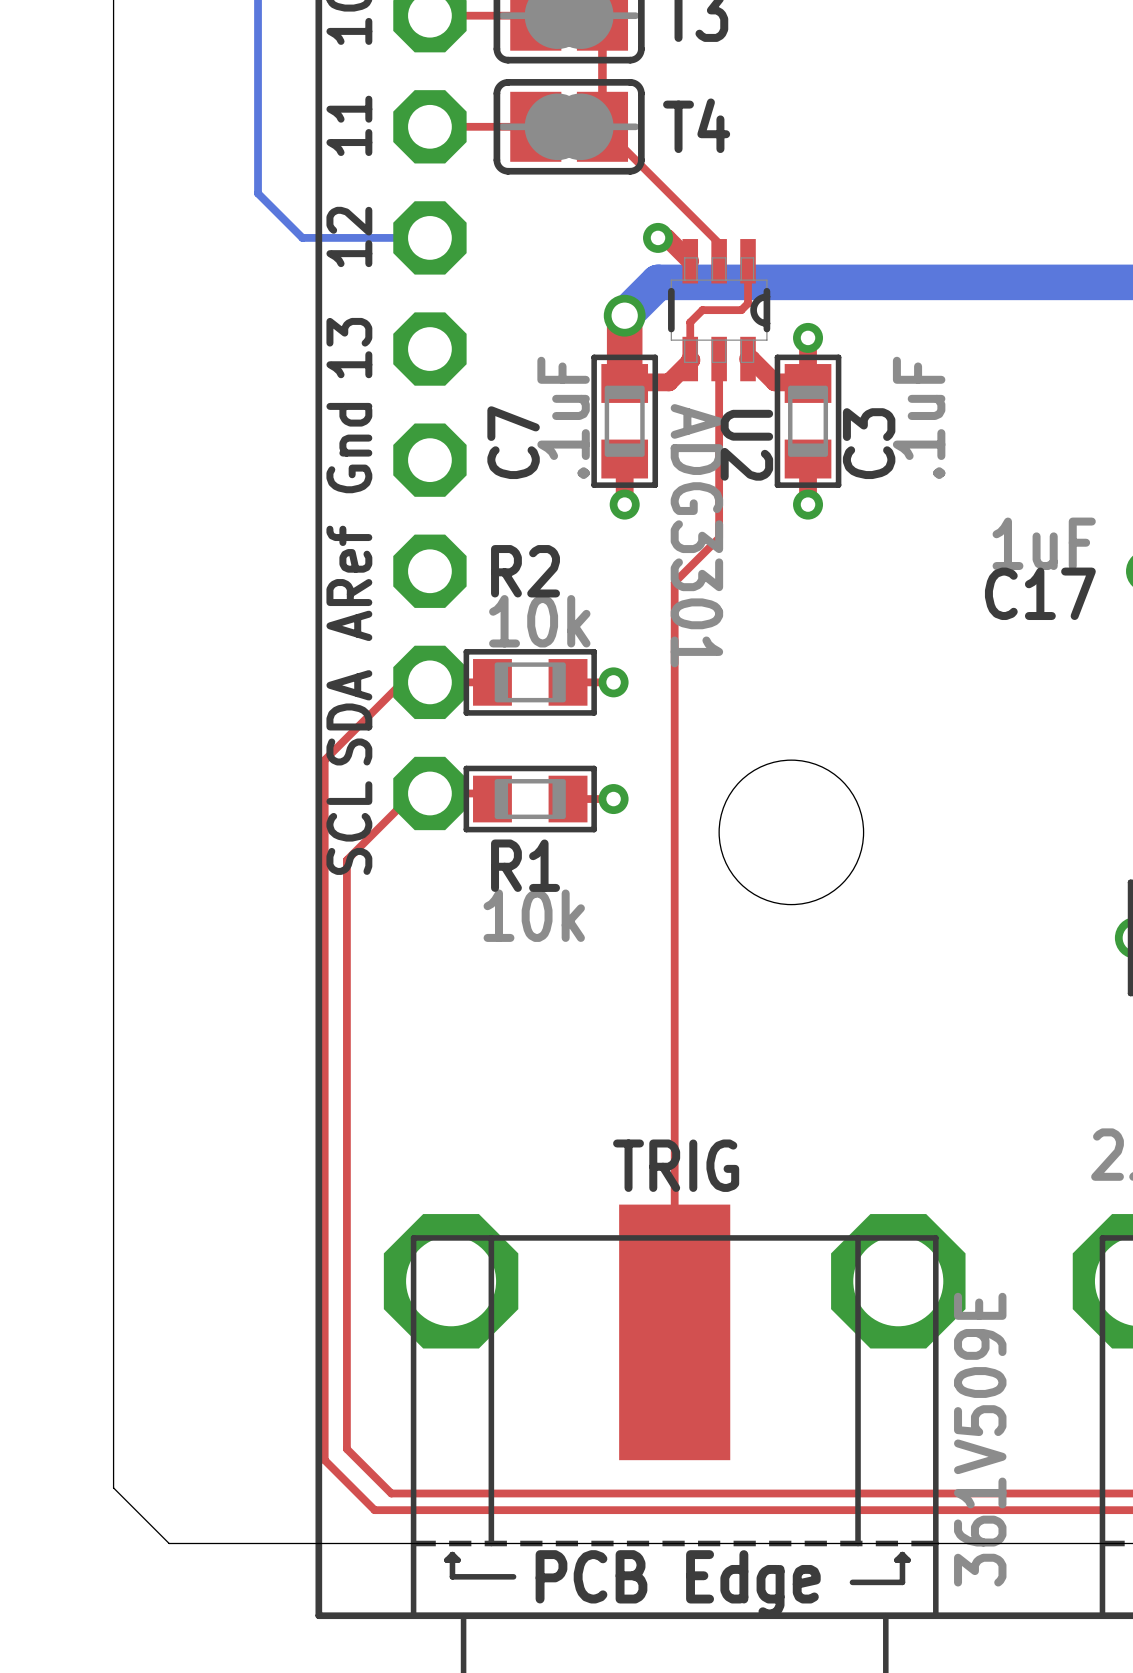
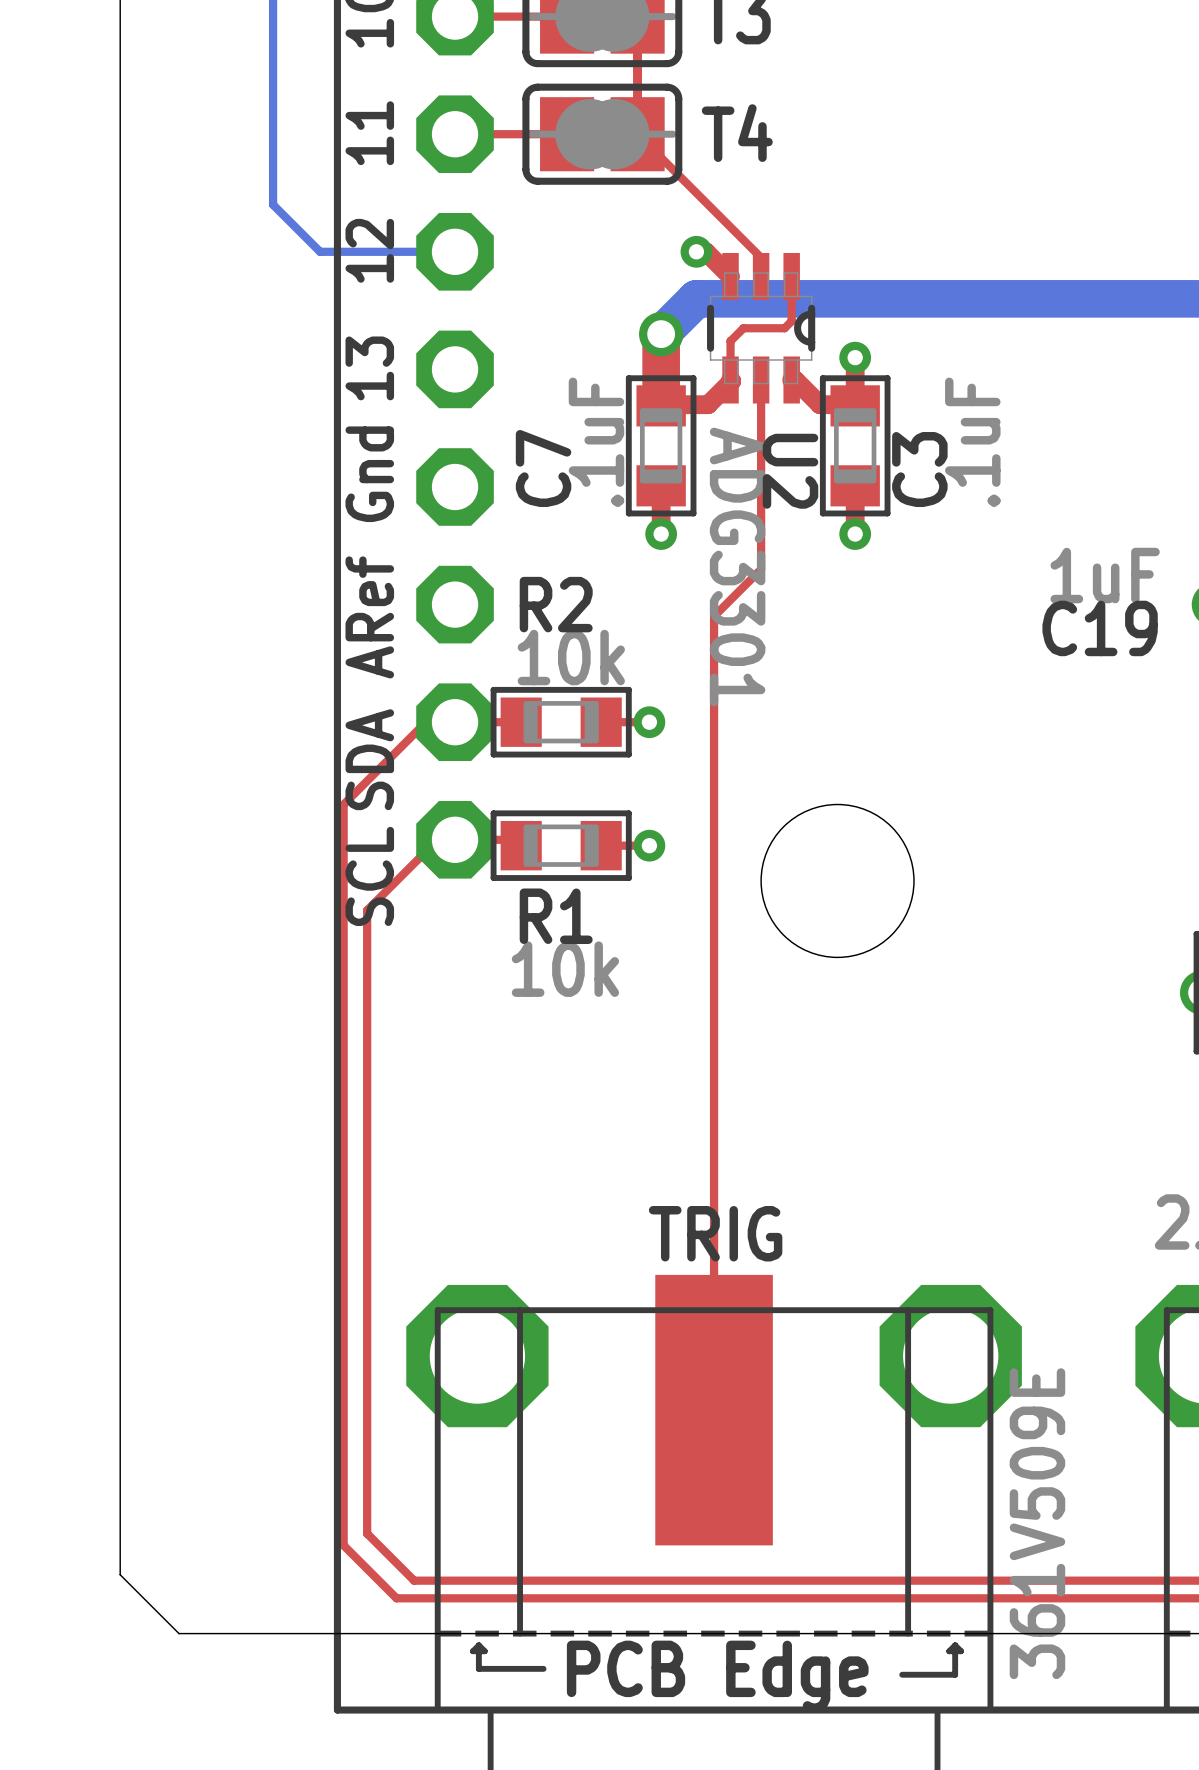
C17 name: C17 (1040, 593) -> C19 (1100, 628)

